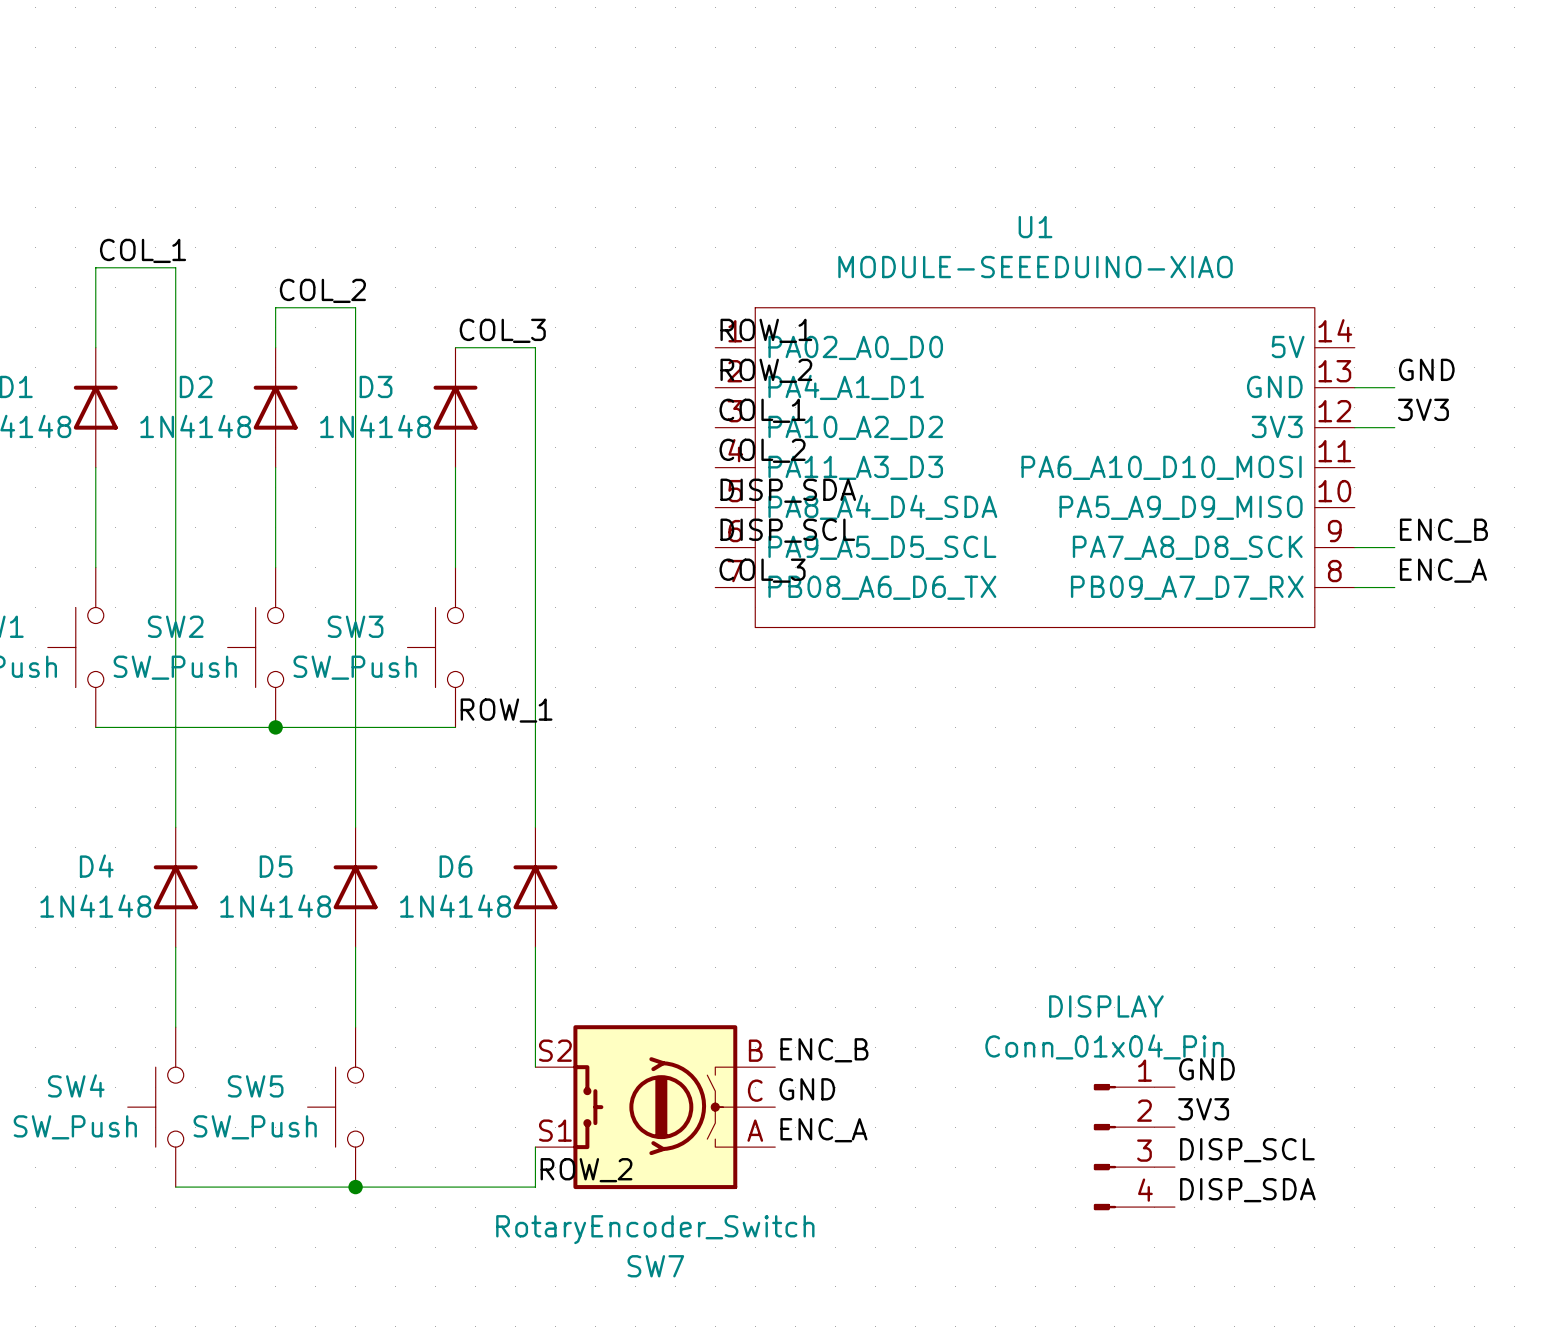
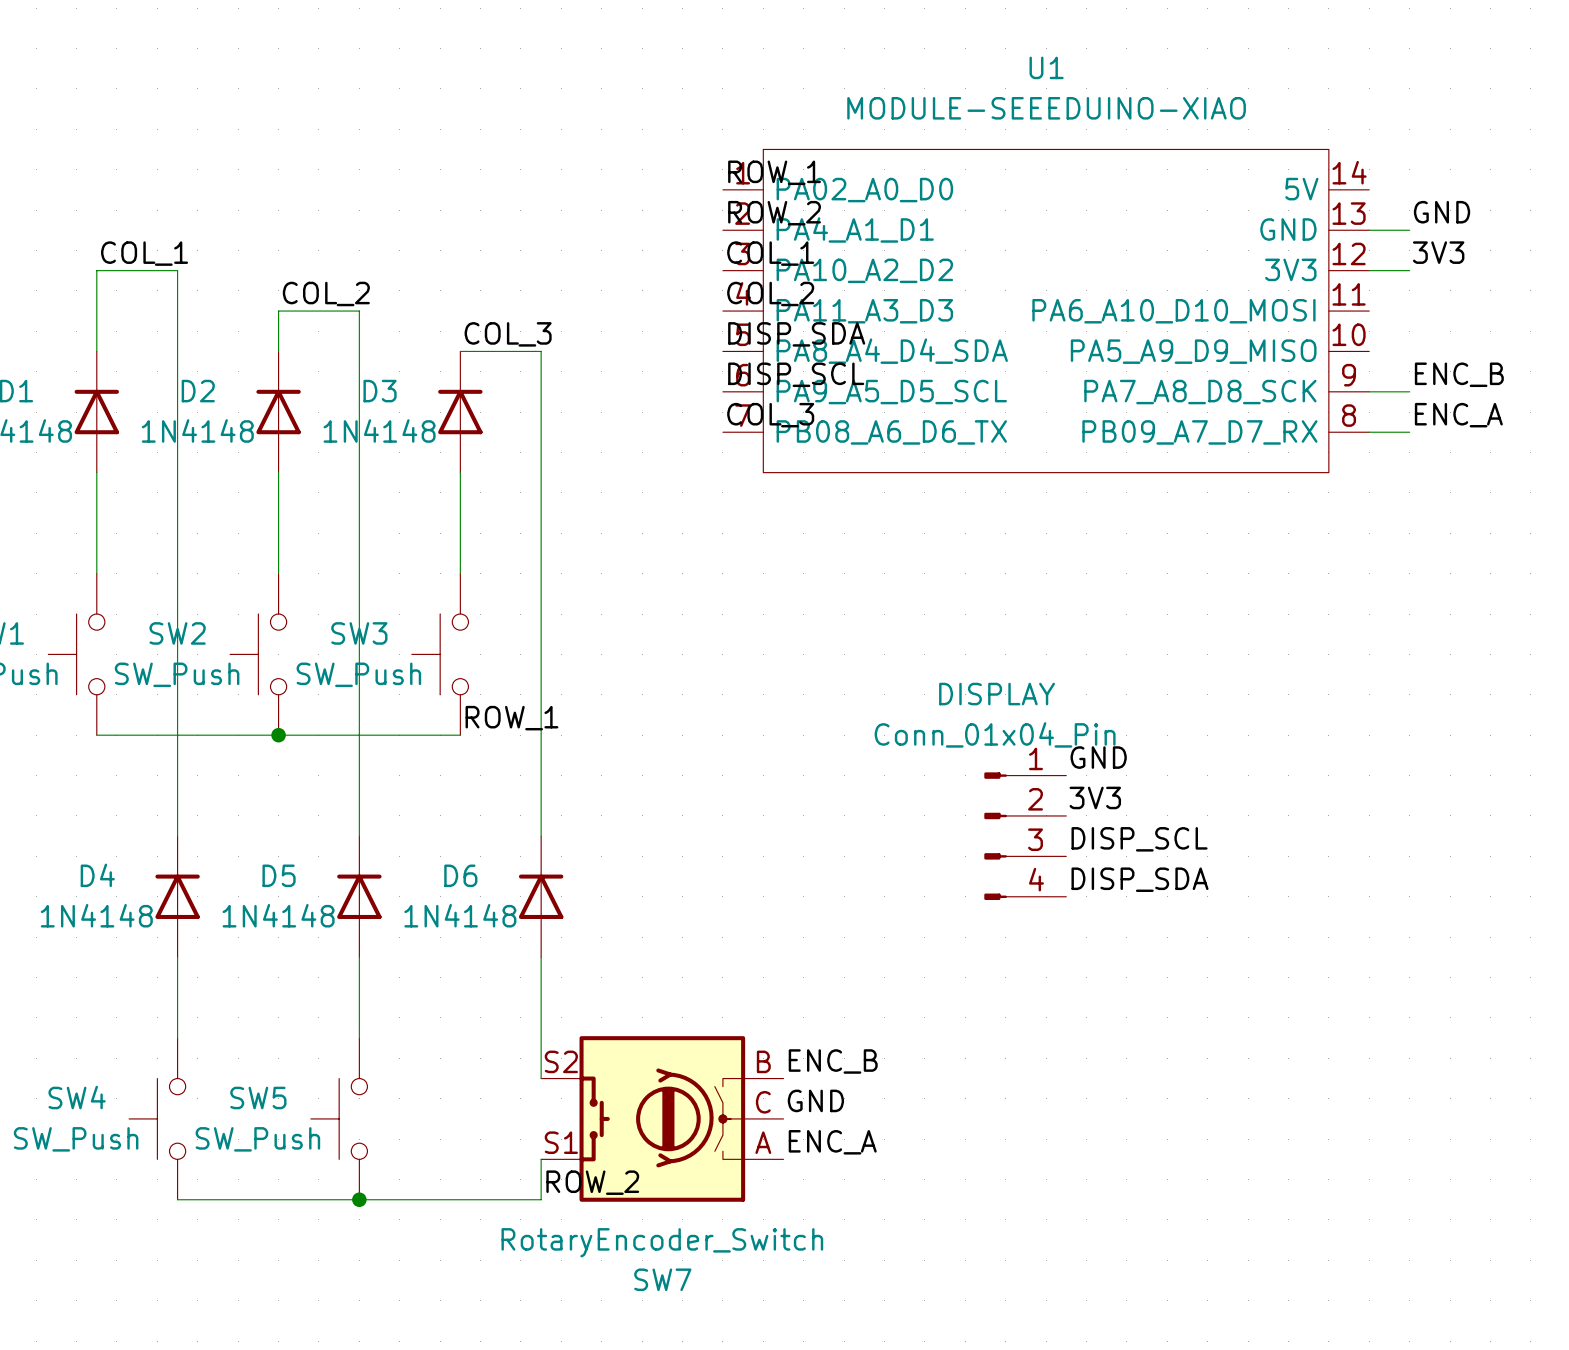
label: none -> ROW_1 (774, 172)
label: none -> GND (1442, 212)
label: none -> ROW_2 (774, 213)
label: none -> 3V3 (1438, 252)
label: none -> COL_1 (770, 253)
label: ROW_1 (766, 330) -> DISP_SDA (796, 334)
label: GND (1426, 369) -> ENC_B (1459, 374)
label: ROW_2 (766, 370) -> DISP_SCL (796, 374)
label: 3V3 (1423, 409) -> ENC_A (1458, 415)
label: COL_1 (762, 410) -> COL_3 (770, 415)
label position: COL_2 (762, 450) -> COL_2 (770, 293)
U1 position: (1035, 467) -> (1046, 311)
label: DISP_SDA (788, 490) -> none
label: DISP_SCL (787, 530) -> none
label: ENC_B (1443, 530) -> none
wire: (1354, 547) (1394, 547) -> (1369, 230) (1409, 230)
label: COL_3 (762, 570) -> none
label: ENC_A (1443, 570) -> none
wire: (1354, 587) (1394, 587) -> (1369, 270) (1409, 270)
label: none -> DISP_SCL (1139, 839)
label: none -> DISP_SDA (1140, 879)
label position: GND (1206, 1069) -> GND (1098, 757)
label position: 3V3 (1203, 1109) -> 3V3 (1095, 797)
DISPLAY position: (1134, 1147) -> (1025, 836)
label: DISP_SCL (1247, 1150) -> none
label: DISP_SDA (1247, 1190) -> none

